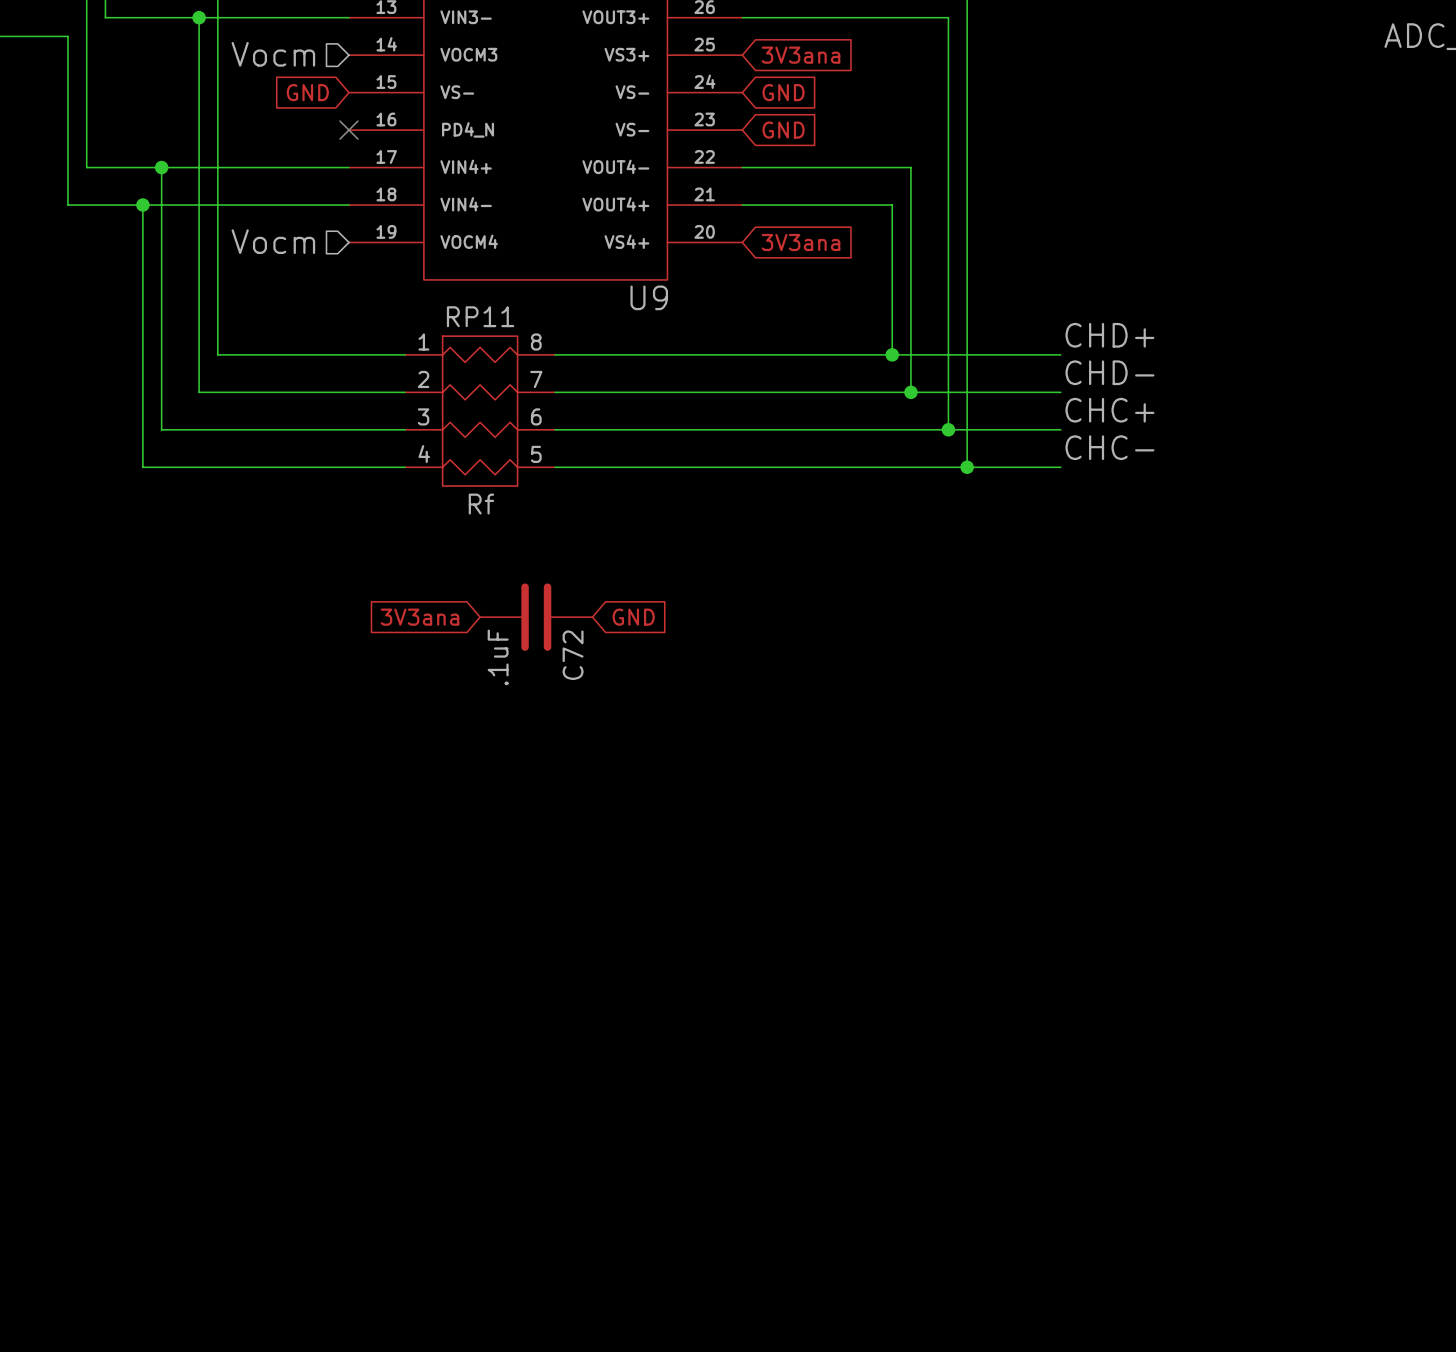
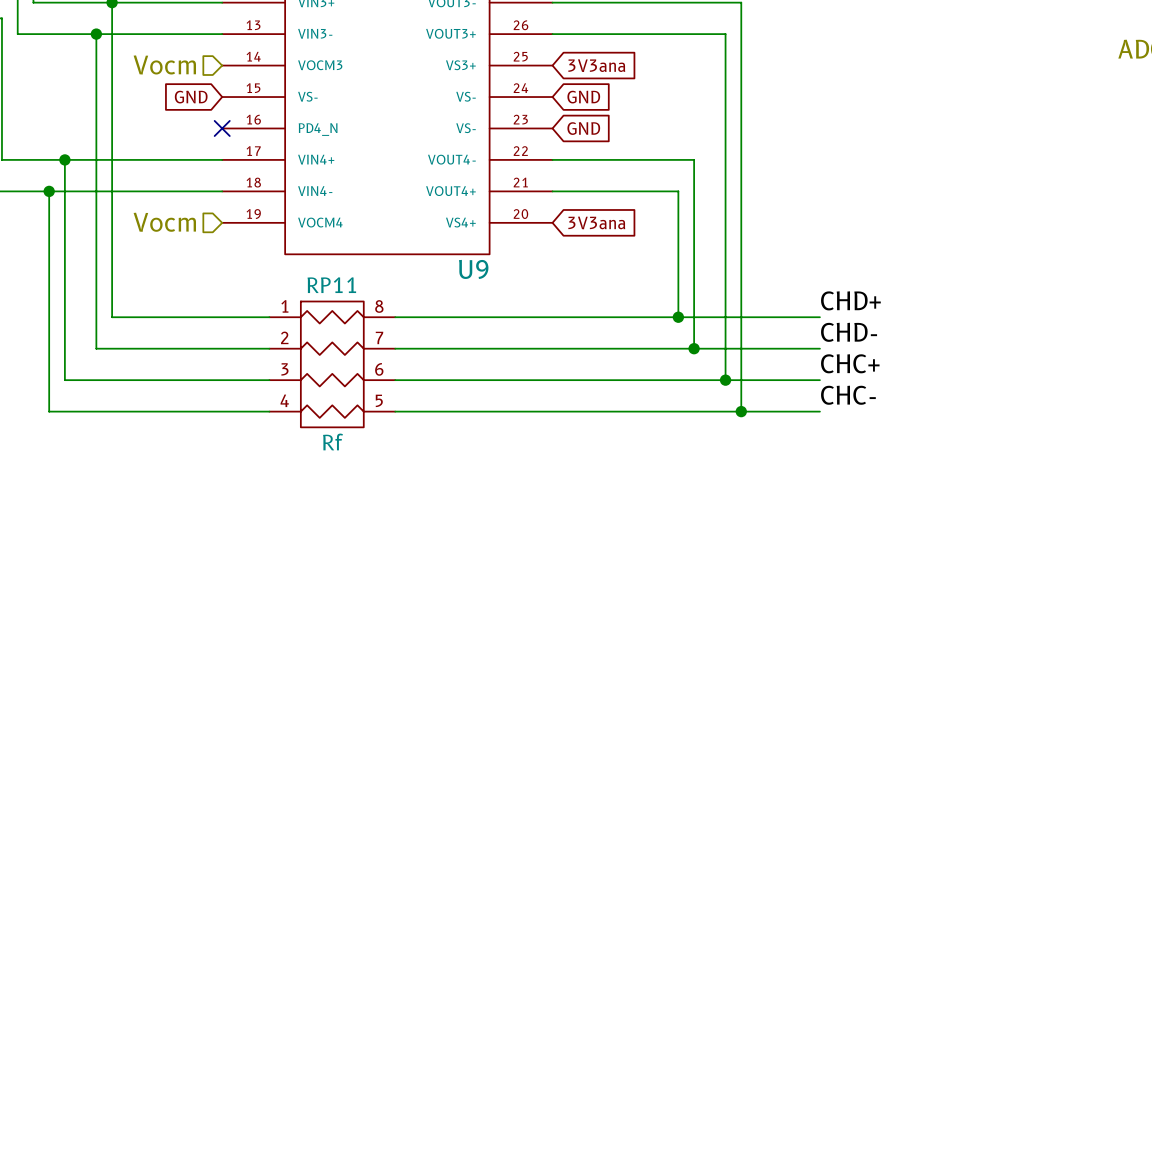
global label: 3V3ana (420, 617) -> none
C72: .1uF (536, 617) -> none
global label: GND (633, 617) -> none

